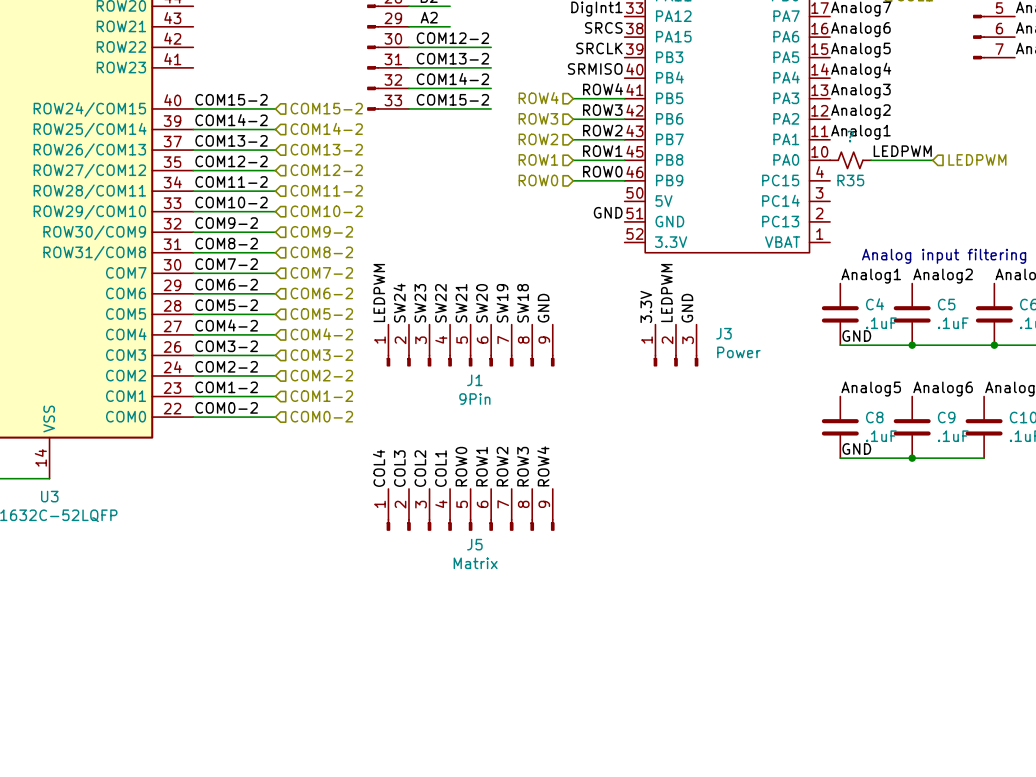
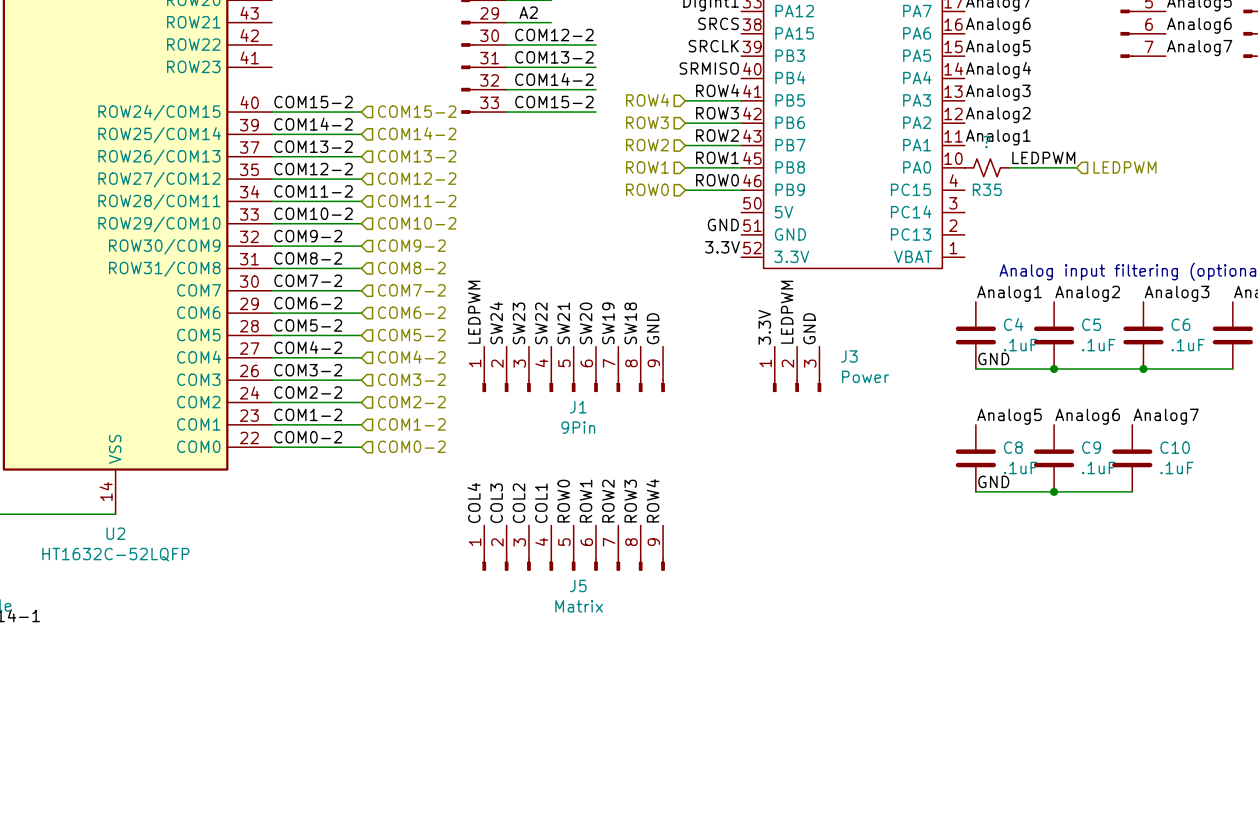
label: none -> 3.3V (722, 247)
U3 name: U3 (49, 496) -> U2 (115, 533)

